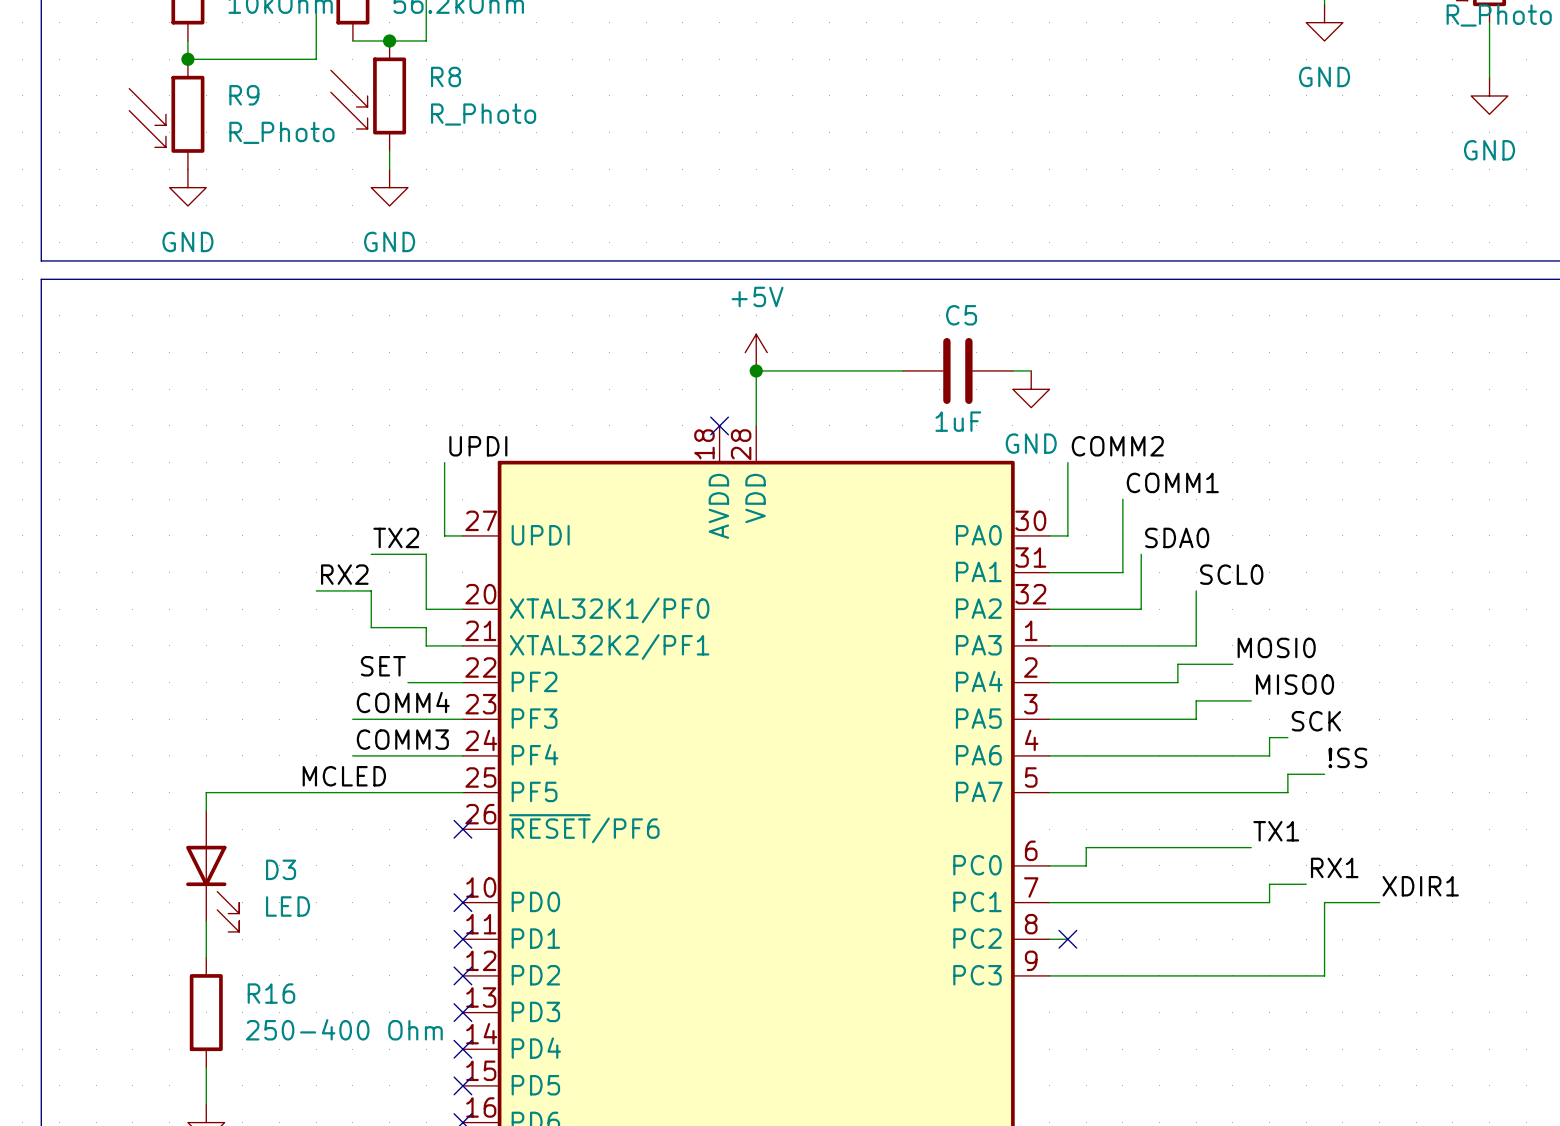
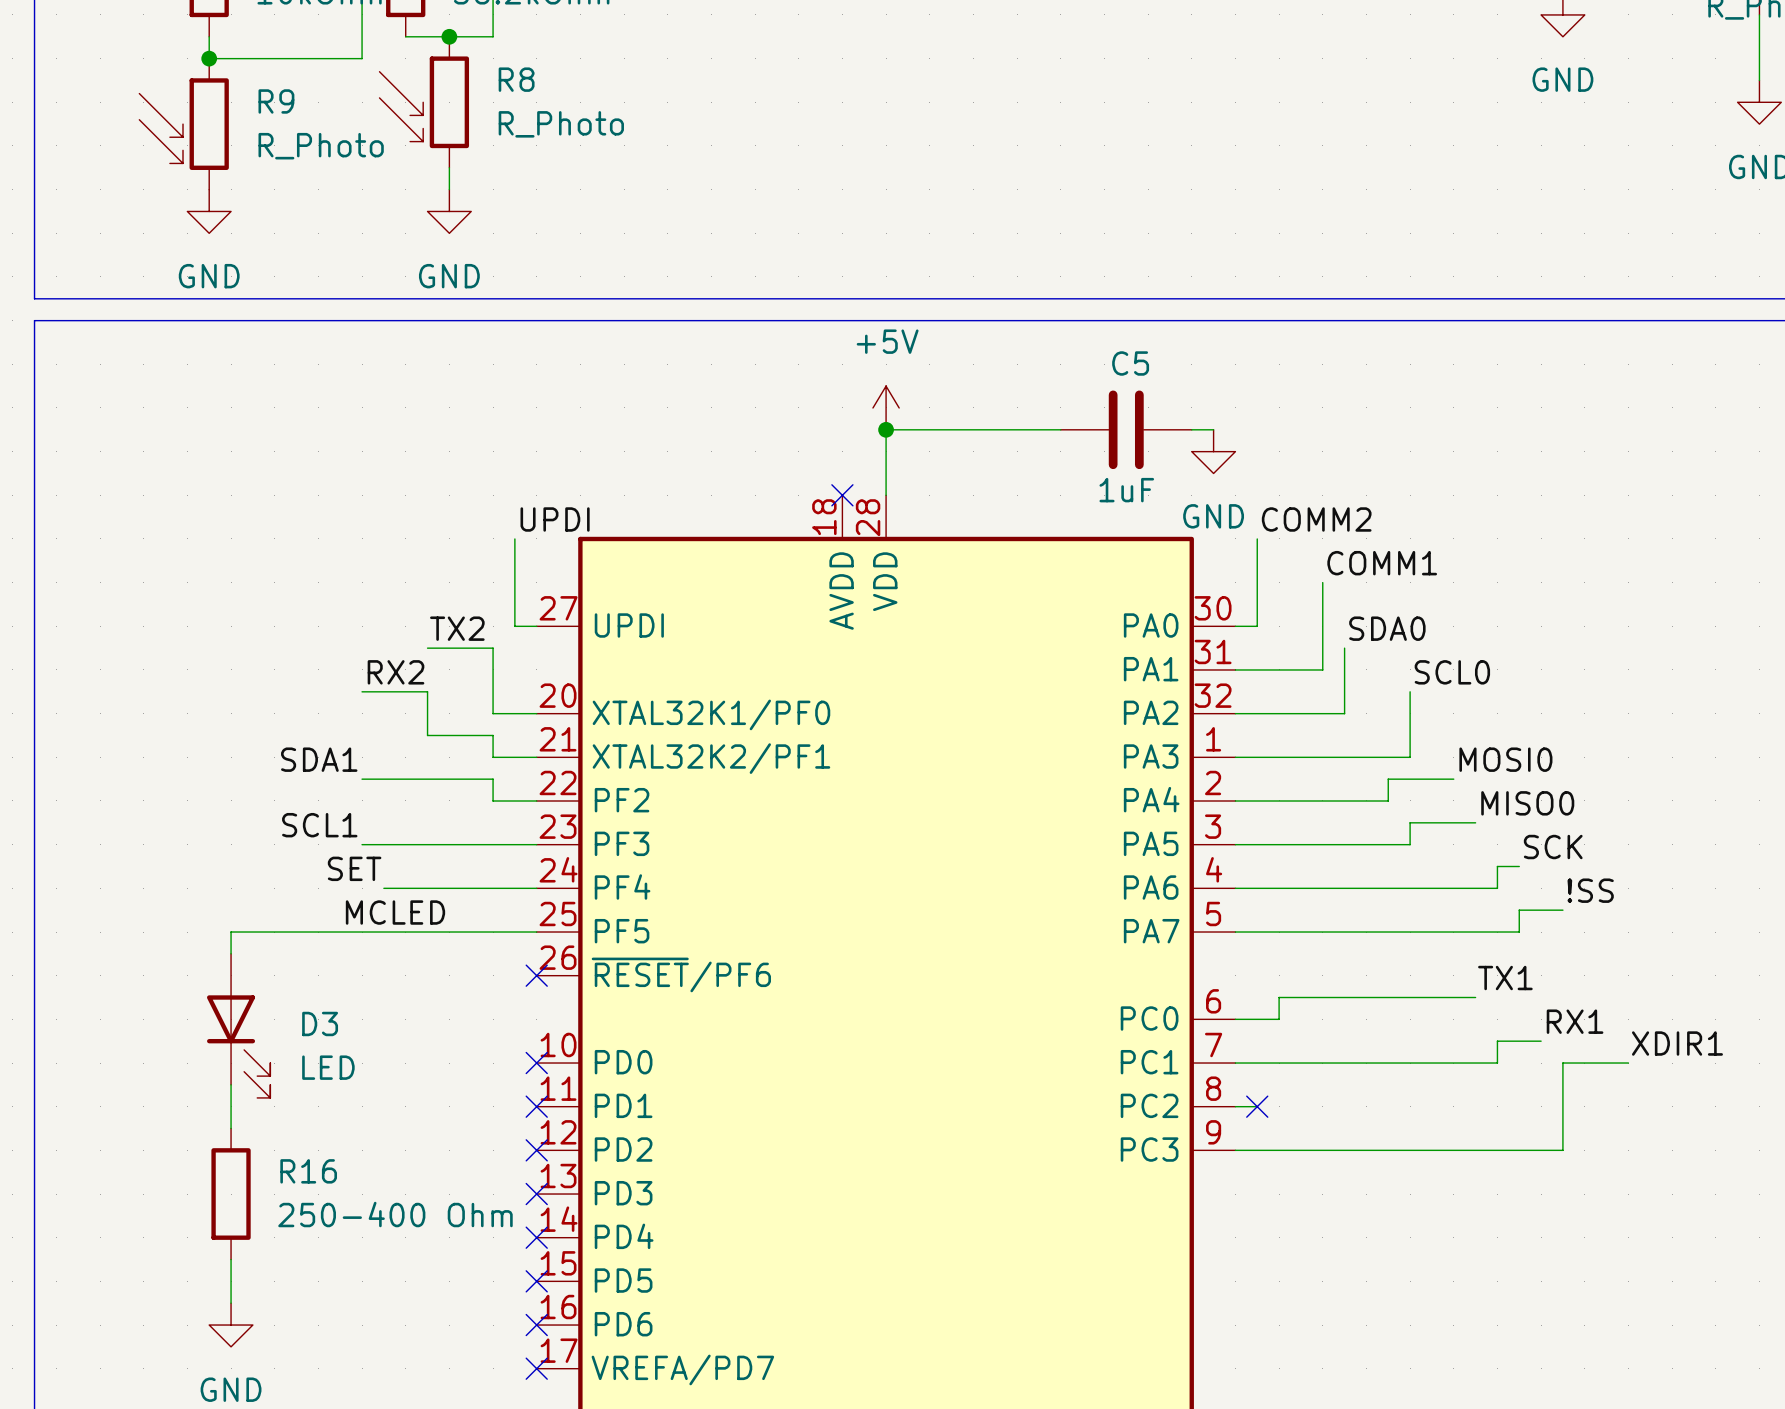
label: none -> SDA1 (319, 759)
label position: SET (383, 666) -> SET (354, 868)
wire: (407, 682) (426, 682) -> (362, 779) (493, 779) (493, 800)
label: none -> SCL1 (319, 825)
label: COMM4 (403, 702) -> none
wire: none -> (362, 844) (405, 844)
label: COMM3 (402, 739) -> none
wire: none -> (383, 888) (405, 888)

